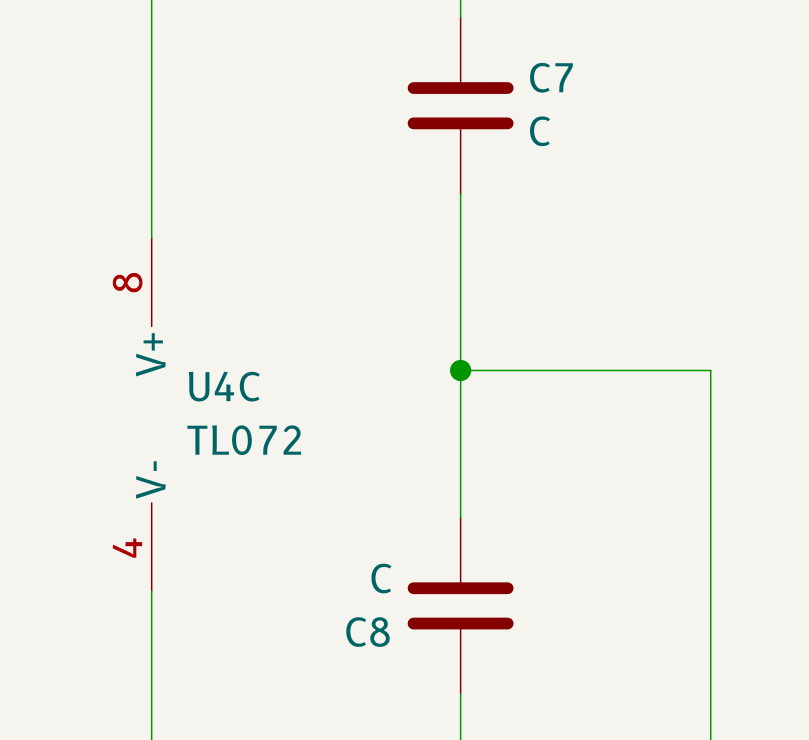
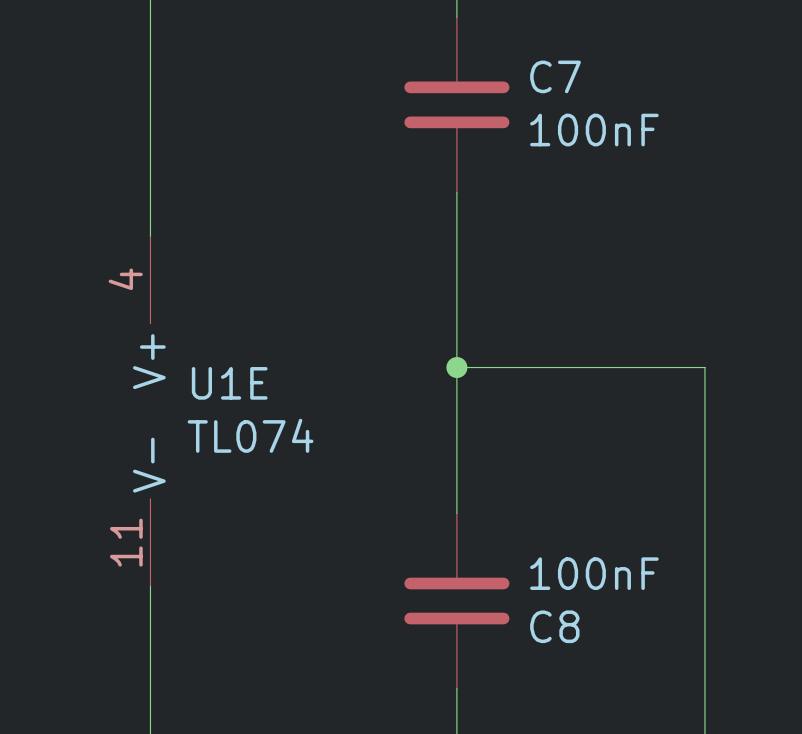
C7 value: C (540, 131) -> 100nF (594, 130)
U4C pin number: 8 (127, 282) -> 4 (125, 279)
U4C name: U4C (224, 386) -> U1E (229, 383)
U4C value: TL072 (244, 440) -> TL074 (250, 435)
U4C pin number: 4 (127, 548) -> 11 (126, 542)
C8 value: C (381, 578) -> 100nF (594, 573)
C8 name position: C8 (367, 632) -> C8 (554, 626)

